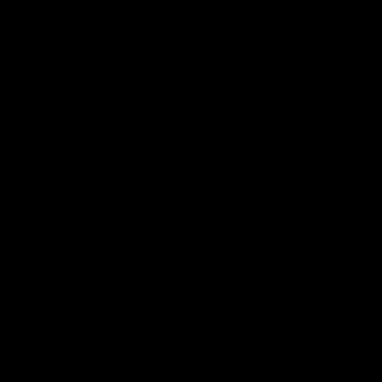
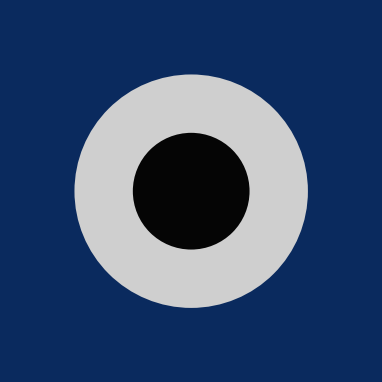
part: none -> (191, 191)

